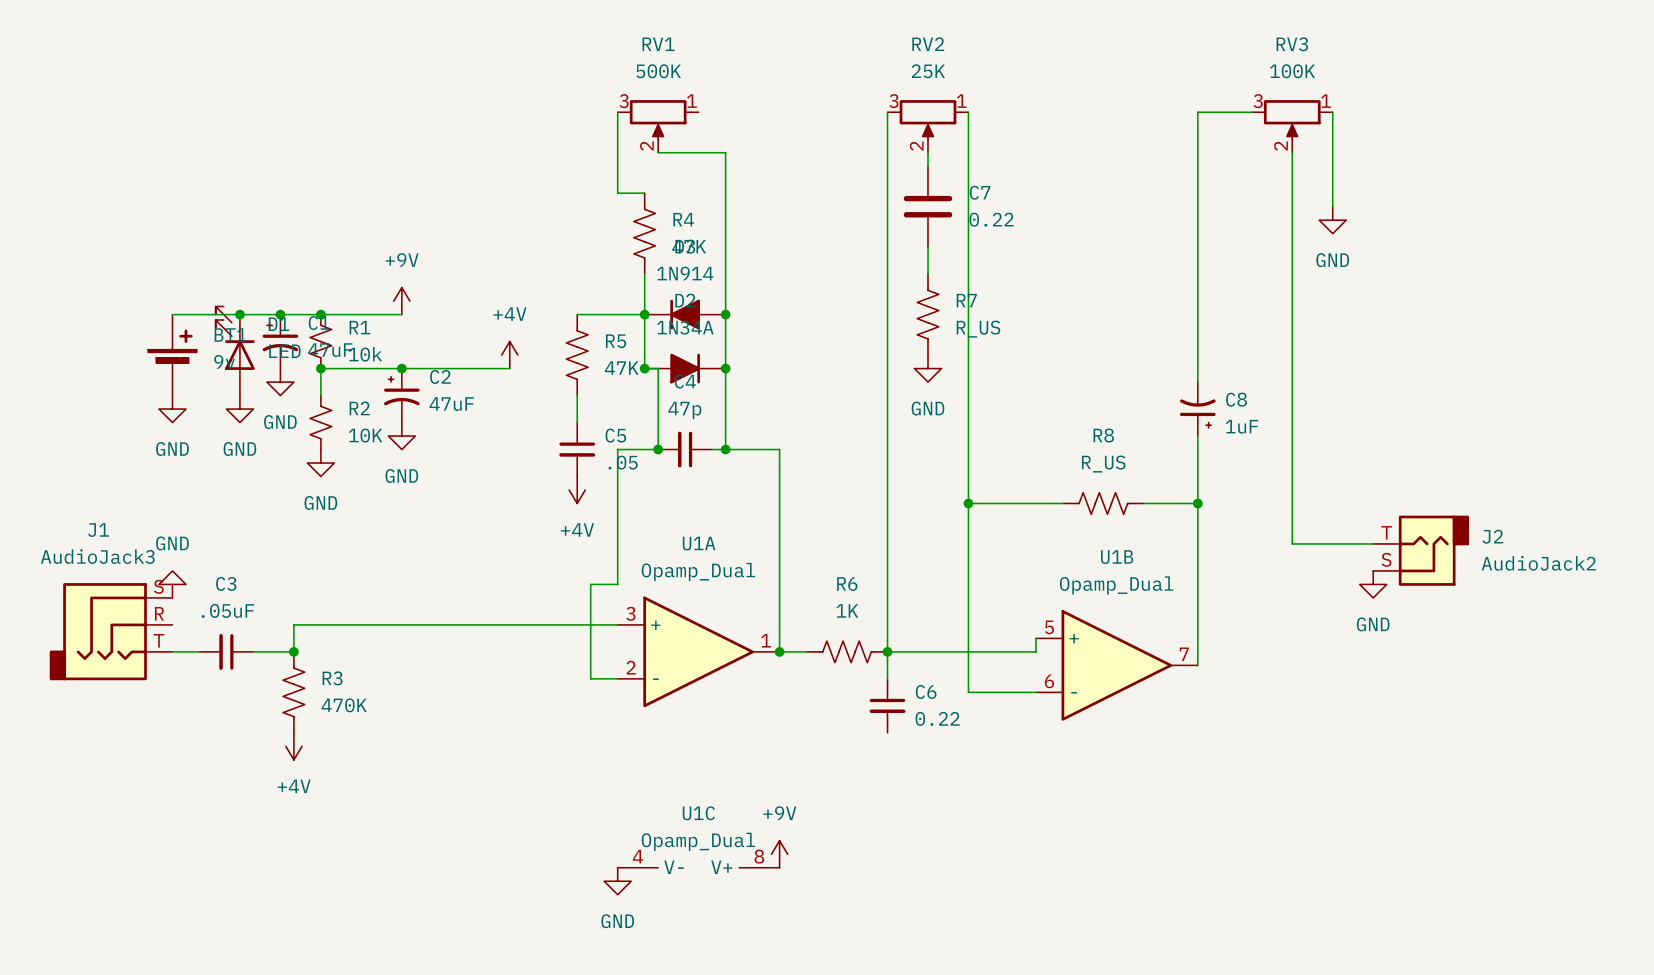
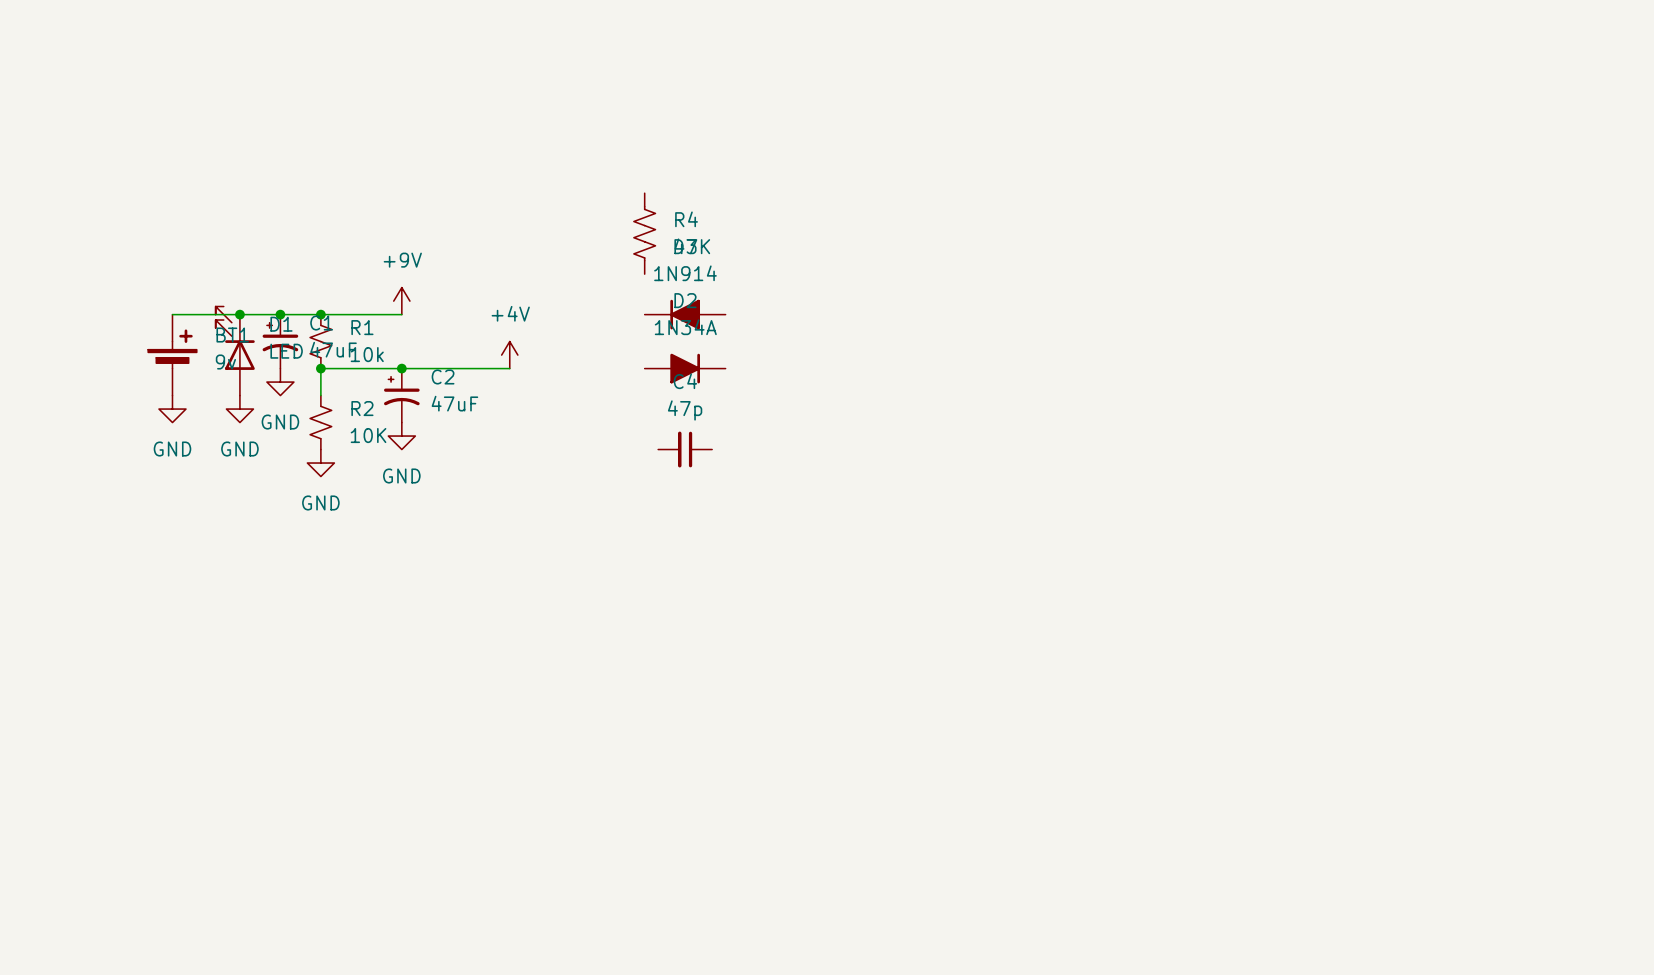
wire: (617, 112) (617, 193) (644, 193) -> none
wire: (887, 112) (887, 678) -> none
wire: (968, 112) (968, 692) (1035, 692) -> none
wire: (1251, 112) (1197, 112) (1197, 382) -> none
wire: (1332, 112) (1332, 206) -> none
RV1: 500K (658, 126) -> none
RV2: 25K (927, 126) -> none
RV3: 100K (1292, 126) -> none
wire: (658, 152) (725, 152) (725, 449) -> none
wire: (927, 152) (927, 166) -> none
wire: (1292, 152) (1292, 543) (1373, 543) -> none
C7: 0.22 (927, 206) -> none
power symbol: GND (1332, 220) -> none
wire: (927, 247) (927, 274) -> none
wire: (644, 274) (644, 368) (658, 368) (658, 449) (617, 449) (617, 584) (590, 584) (590, 678) (617, 678) -> none
wire: (577, 314) (644, 314) -> none
junction: (644, 314) -> none
junction: (725, 314) -> none
R7: R_US (927, 314) -> none
R5: 47K (577, 355) -> none
junction: (644, 368) -> none
junction: (725, 368) -> none
power symbol: GND (927, 368) -> none
wire: (577, 395) (577, 422) -> none
C8: 1uF (1197, 409) -> none
wire: (1197, 436) (1197, 665) -> none
C5: .05 (577, 449) -> none
junction: (658, 449) -> none
wire: (712, 449) (779, 449) (779, 651) (806, 651) -> none
junction: (725, 449) -> none
power symbol: +4V (577, 490) -> none
wire: (968, 503) (1062, 503) -> none
junction: (968, 503) -> none
R8: R_US (1103, 503) -> none
wire: (1143, 503) (1197, 503) -> none
junction: (1197, 503) -> none
J2: AudioJack2 (1421, 550) -> none
power symbol: GND (172, 584) -> none
power symbol: GND (1373, 584) -> none
wire: (617, 624) (293, 624) (293, 651) (253, 651) -> none
J1: AudioJack3 (111, 631) -> none
wire: (1035, 638) (1035, 651) (887, 651) -> none
wire: (172, 651) (199, 651) -> none
C3: .05uF (226, 651) -> none
junction: (293, 651) -> none
U1A: Opamp_Dual (698, 651) -> none
junction: (779, 651) -> none
R6: 1K (847, 651) -> none
junction: (887, 651) -> none
U1B: Opamp_Dual (1116, 665) -> none
R3: 470K (293, 692) -> none
C6: 0.22 (887, 705) -> none
power symbol: +4V (293, 746) -> none
power symbol: +9V (779, 854) -> none
U1C: Opamp_Dual (698, 867) -> none
power symbol: GND (617, 881) -> none

